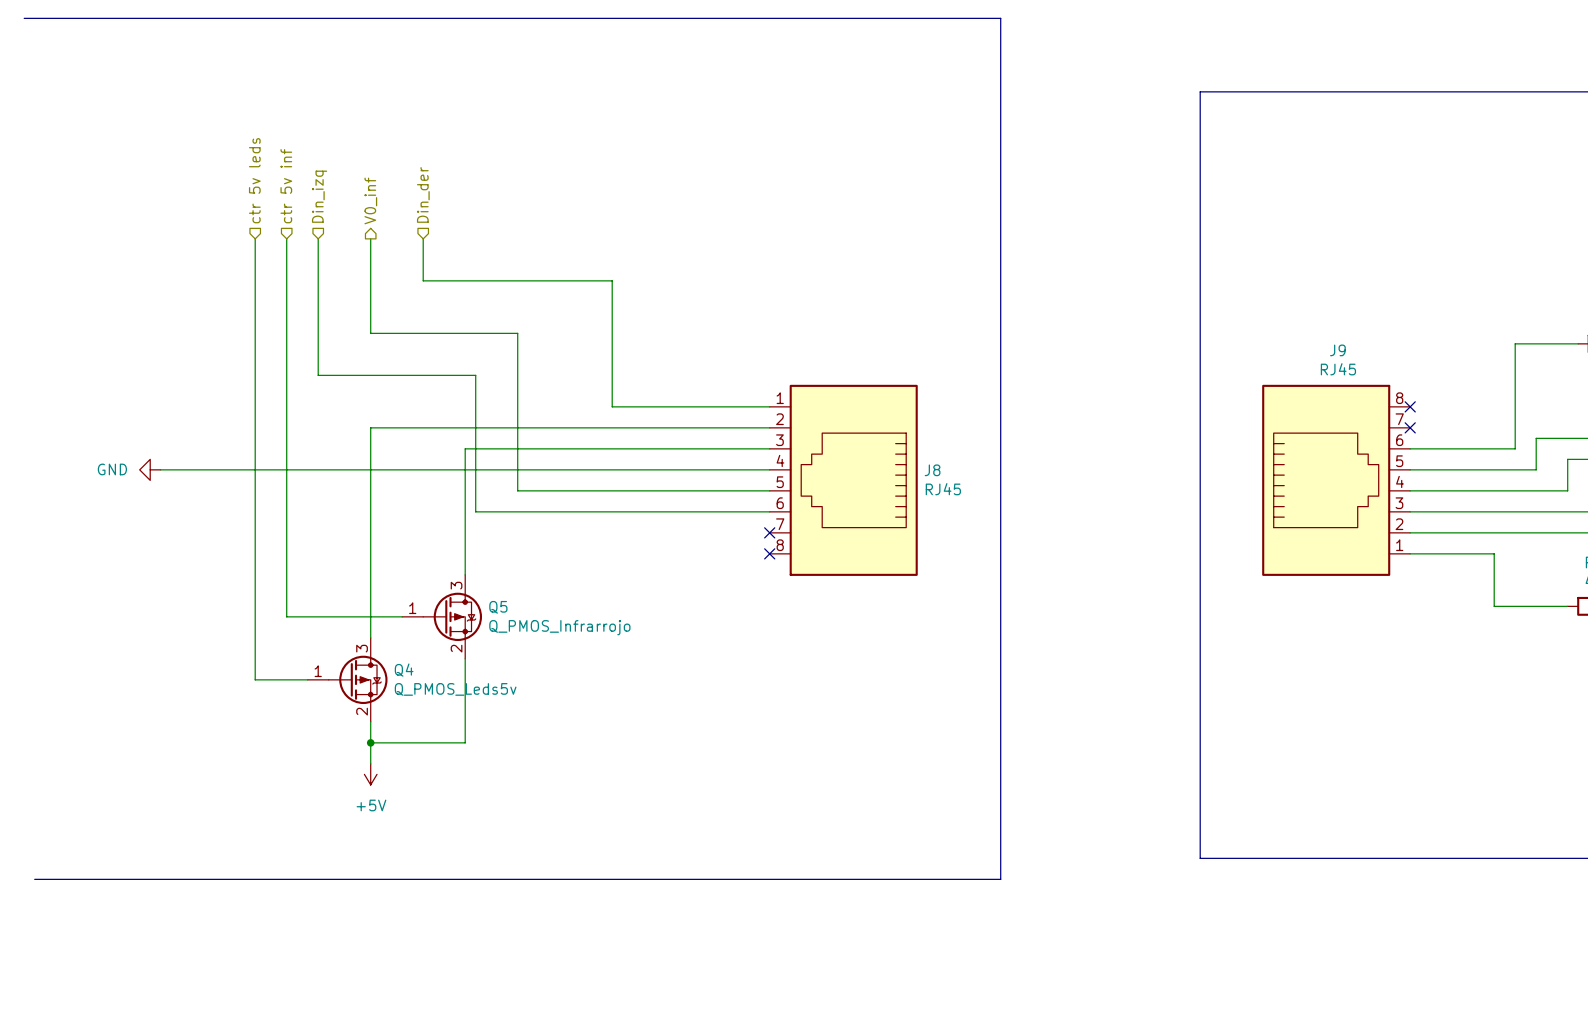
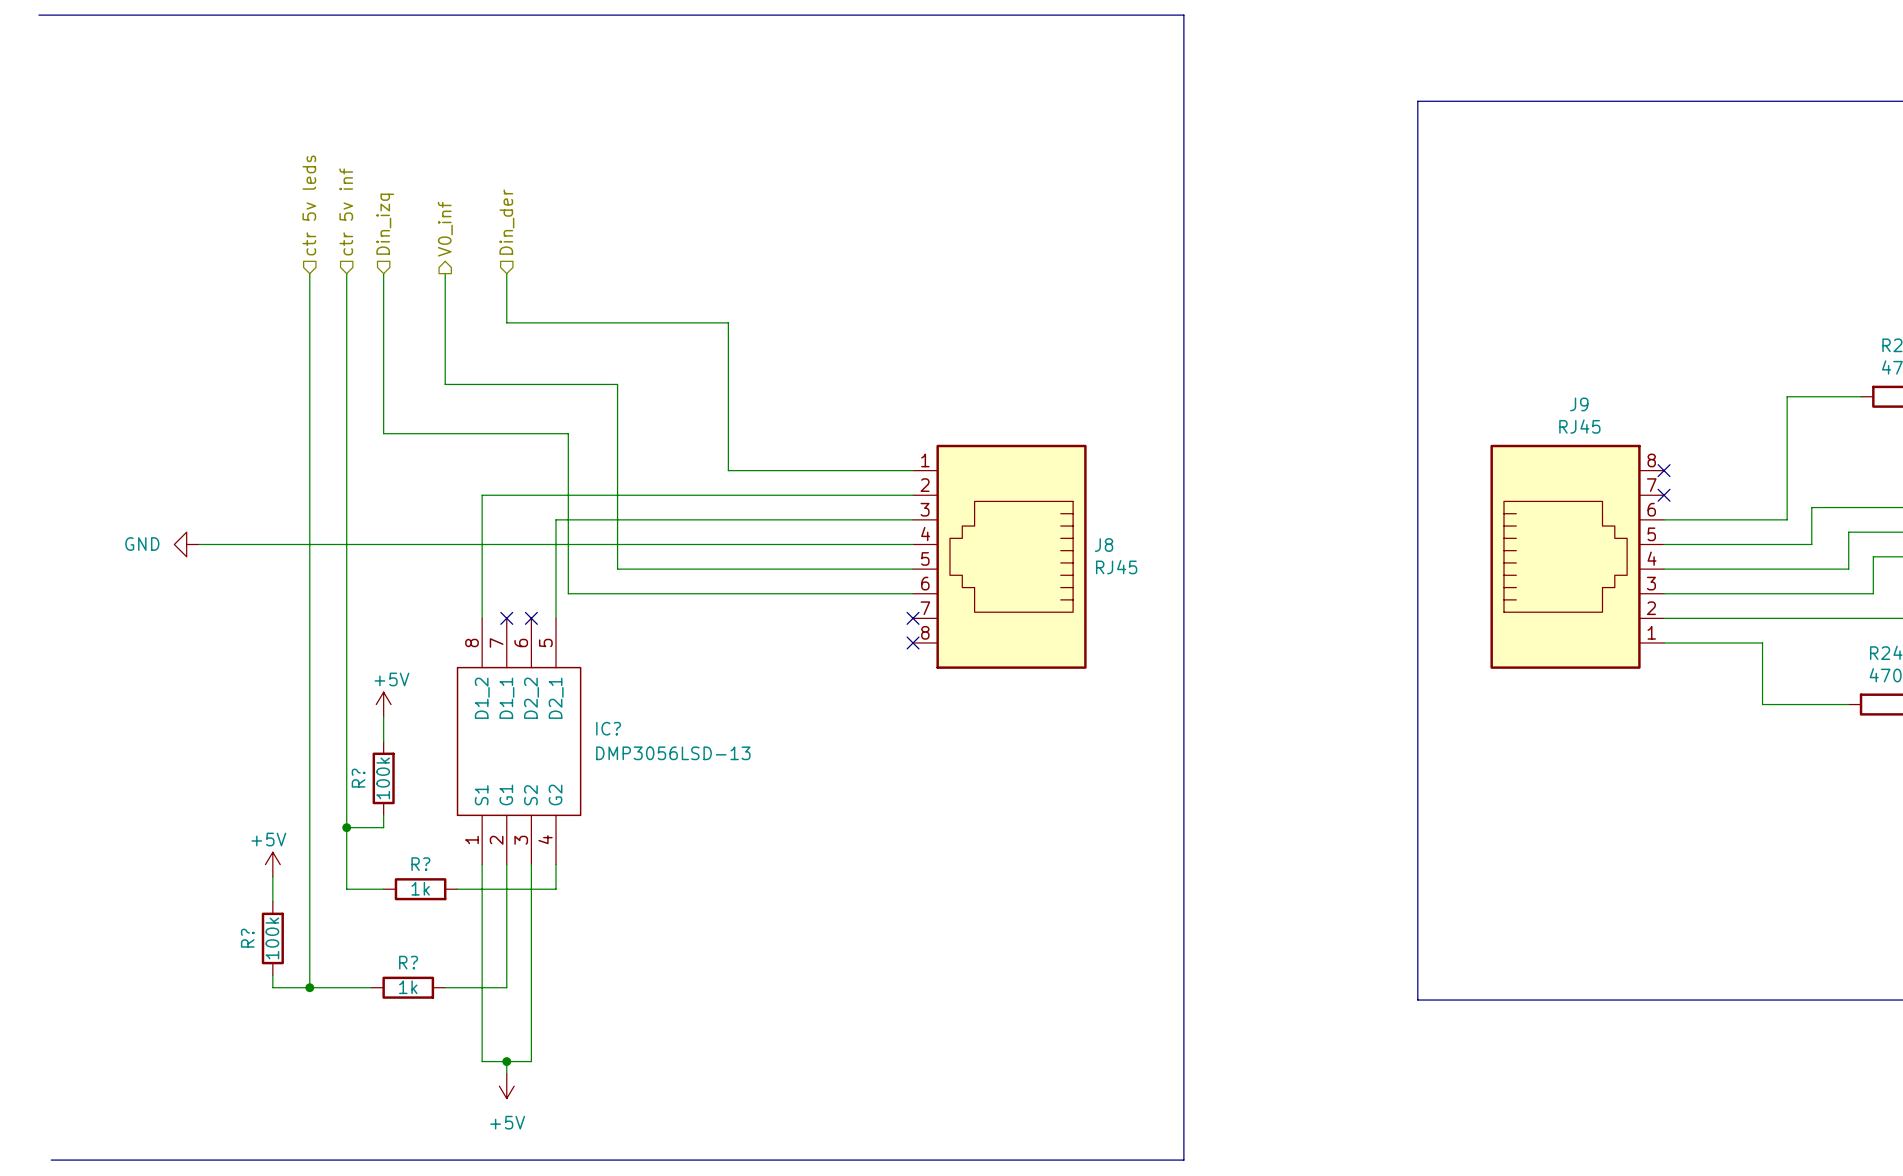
wire: (402, 427) (370, 427) (370, 637) -> (482, 495) (482, 618)
no-connect mark: none -> (506, 618)
no-connect mark: none -> (531, 618)
power symbol: none -> +5V (383, 704)
wire: (286, 616) (402, 616) -> (346, 716) (346, 889) (383, 889)
wire: none -> (383, 716) (383, 741)
Q5: Q_PMOS_Infrarrojo (442, 616) -> none
IC?: none -> DMP3056LSD-13 (519, 741)
wire: (465, 658) (465, 742) (370, 742) -> none
R?: none -> 100k (383, 778)
wire: (255, 679) (307, 679) -> (309, 790) (309, 987)
Q4: Q_PMOS_Leds5v (347, 679) -> none
wire: none -> (383, 815) (383, 827) (346, 827)
junction: none -> (346, 827)
wire: (370, 721) (370, 763) -> none
power symbol: none -> +5V (272, 864)
junction: (370, 742) -> none
wire: none -> (482, 864) (482, 1061) (531, 1061) (531, 864)
wire: none -> (506, 864) (506, 987) (445, 987)
wire: none -> (556, 864) (556, 889) (457, 889)
wire: none -> (272, 876) (272, 901)
R?: none -> 1k (420, 889)
power symbol: +5V (370, 774) -> none
R?: none -> 100k (272, 938)
wire: none -> (272, 975) (272, 987) (371, 987)
junction: none -> (309, 987)
R?: none -> 1k (408, 987)
line: (34, 879) (1000, 879) -> (51, 1160) (1183, 1160) (1183, 1024)
wire: none -> (506, 1061) (506, 1073)
junction: none -> (506, 1061)
power symbol: none -> +5V (506, 1086)

